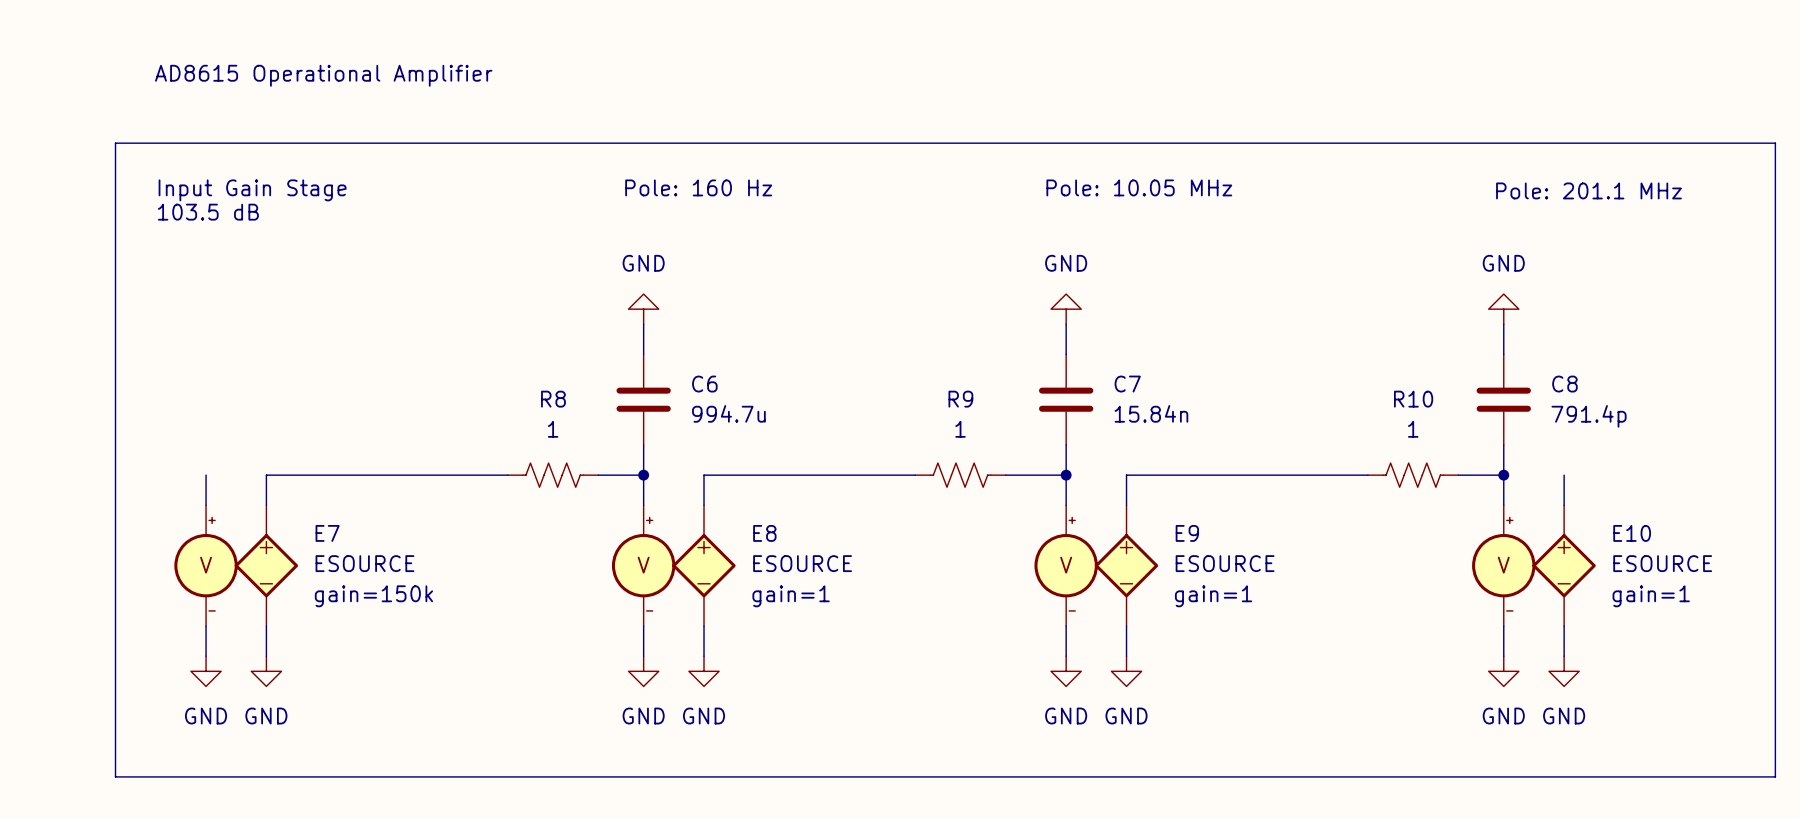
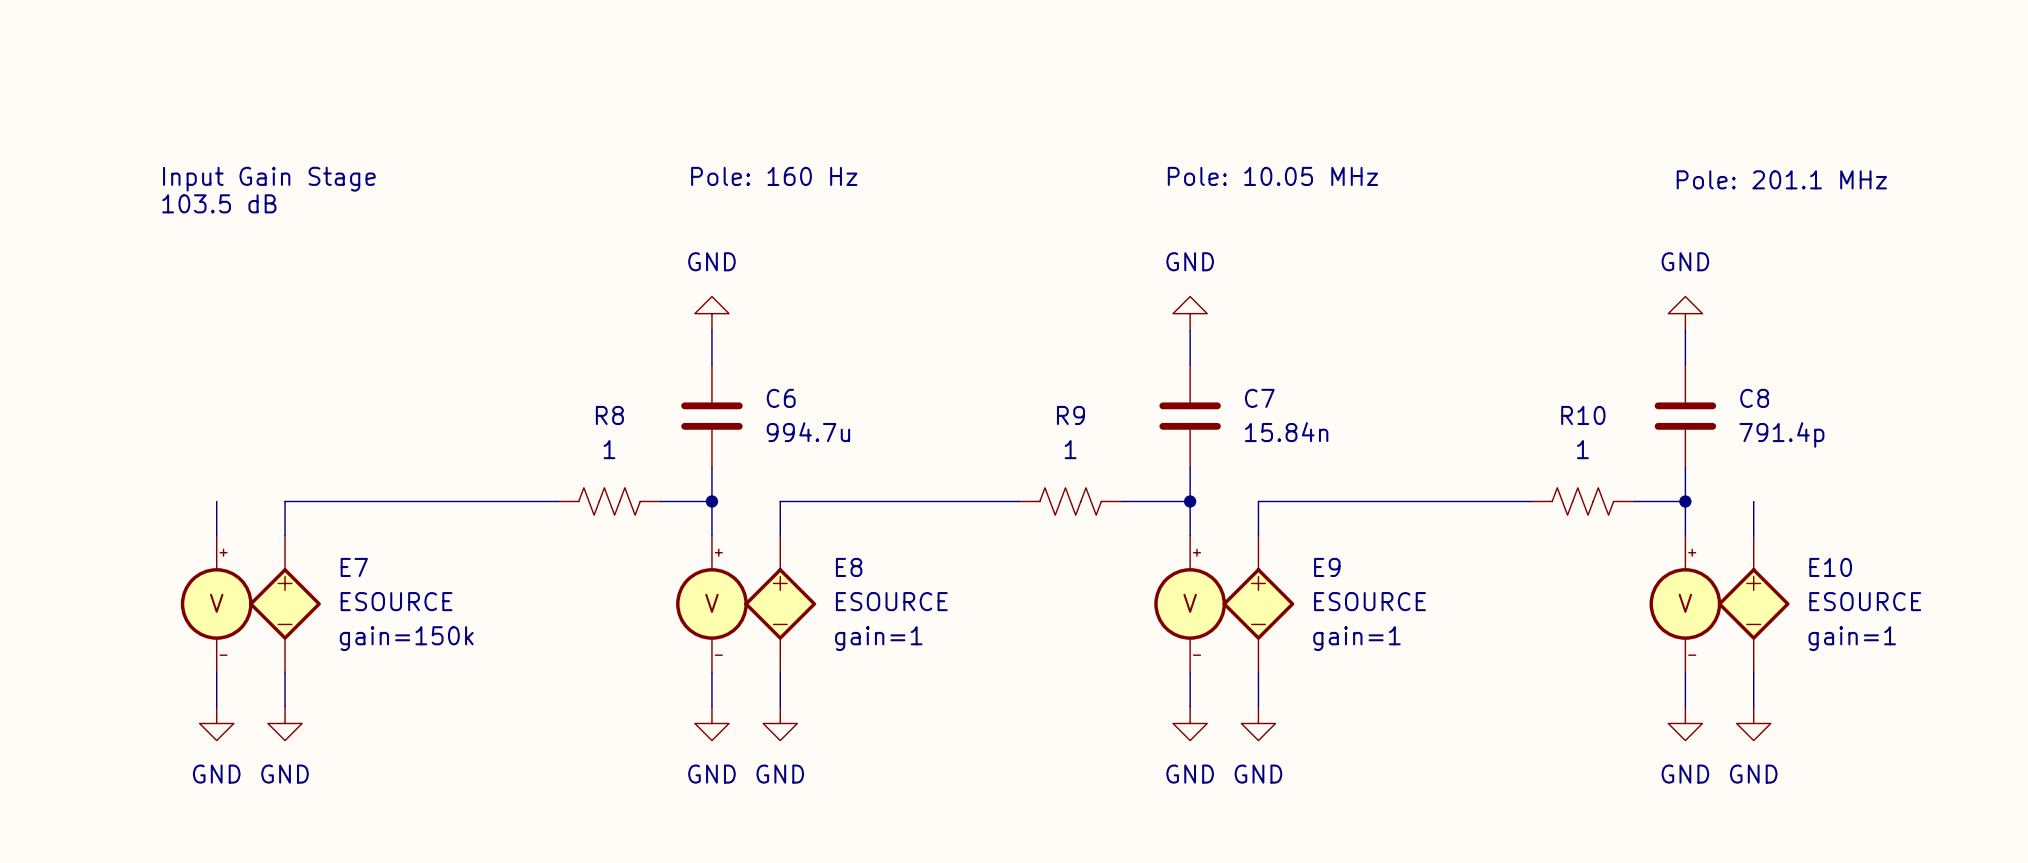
text: AD8615 Operational Amplifier (323, 75) -> none
line: (115, 143) (1775, 143) (1775, 776) (115, 776) (115, 143) -> none

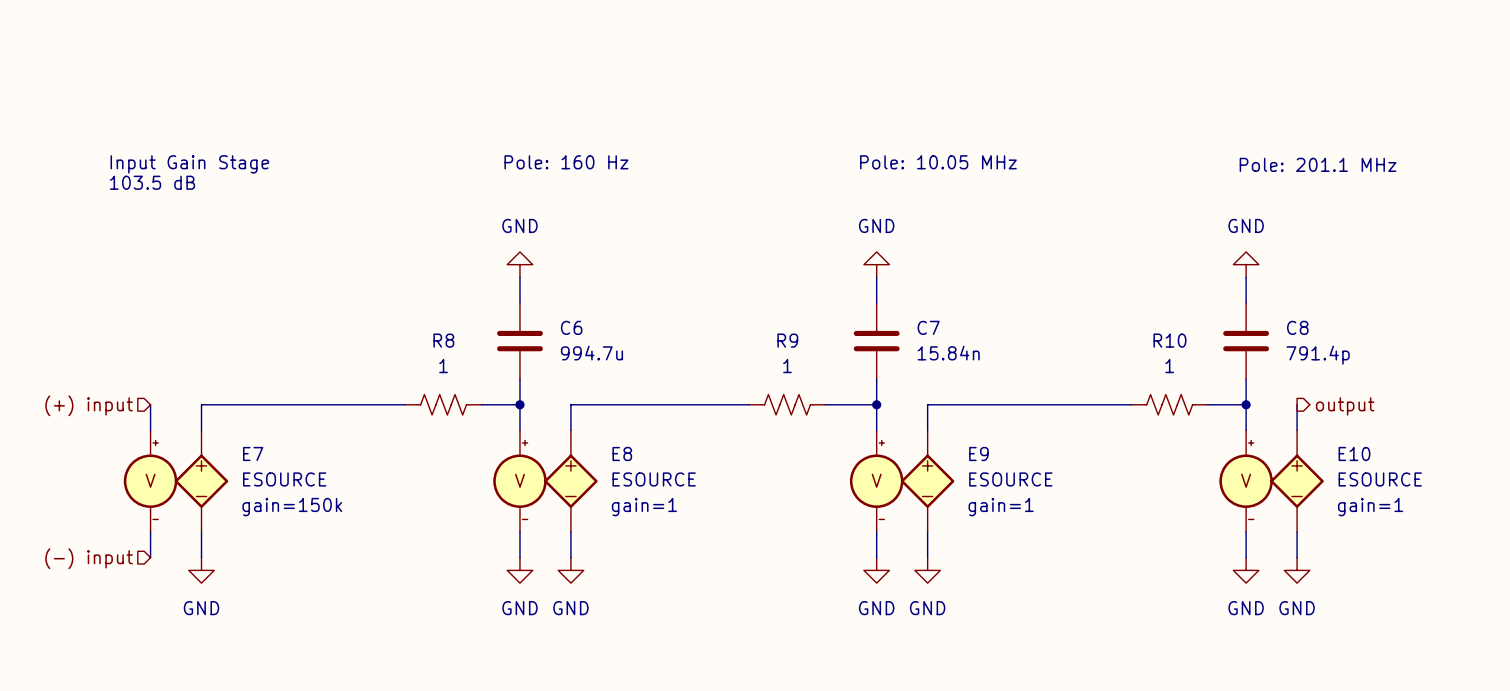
hierarchical label: none -> (+) input (89, 405)
hierarchical label: none -> output (1345, 406)
hierarchical label: none -> (-) input (89, 558)
power symbol: GND (216, 723) -> none

